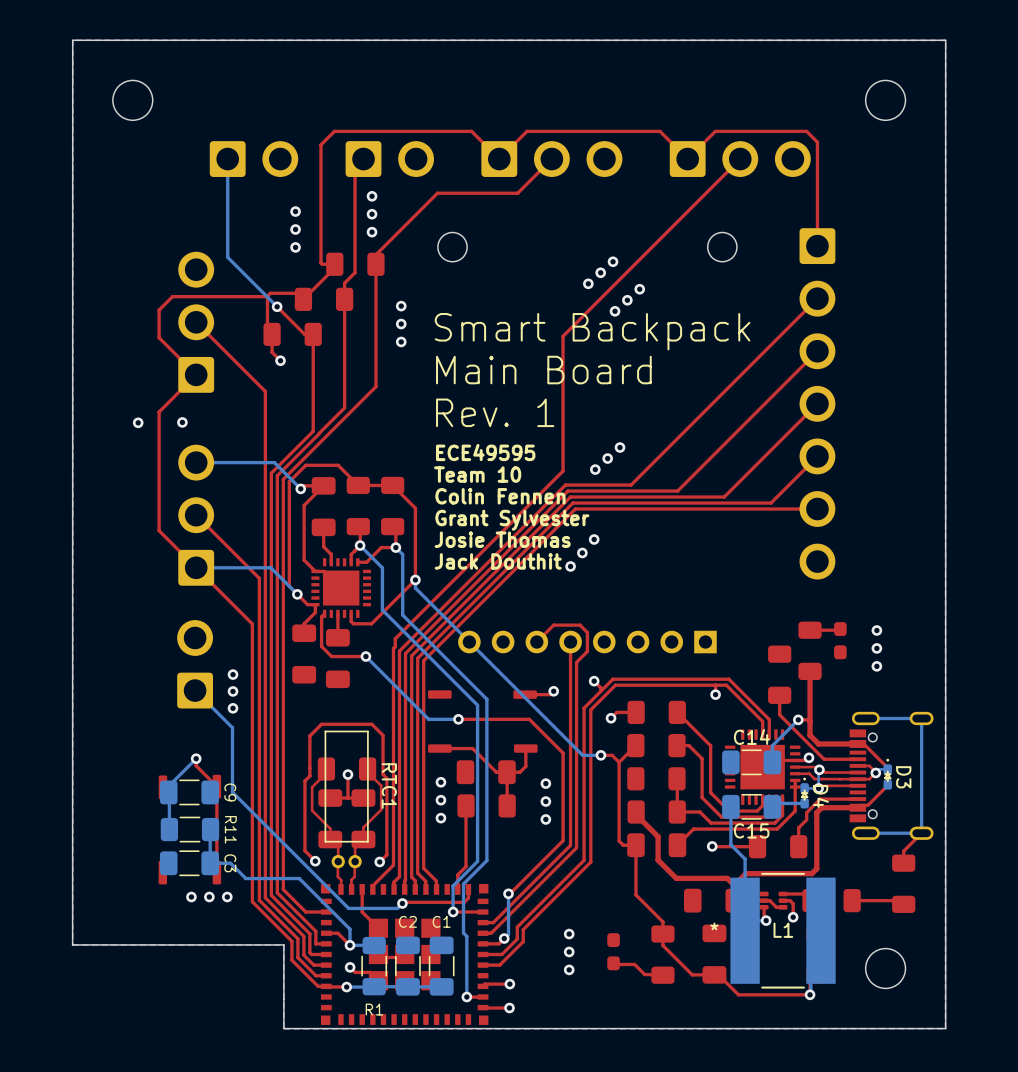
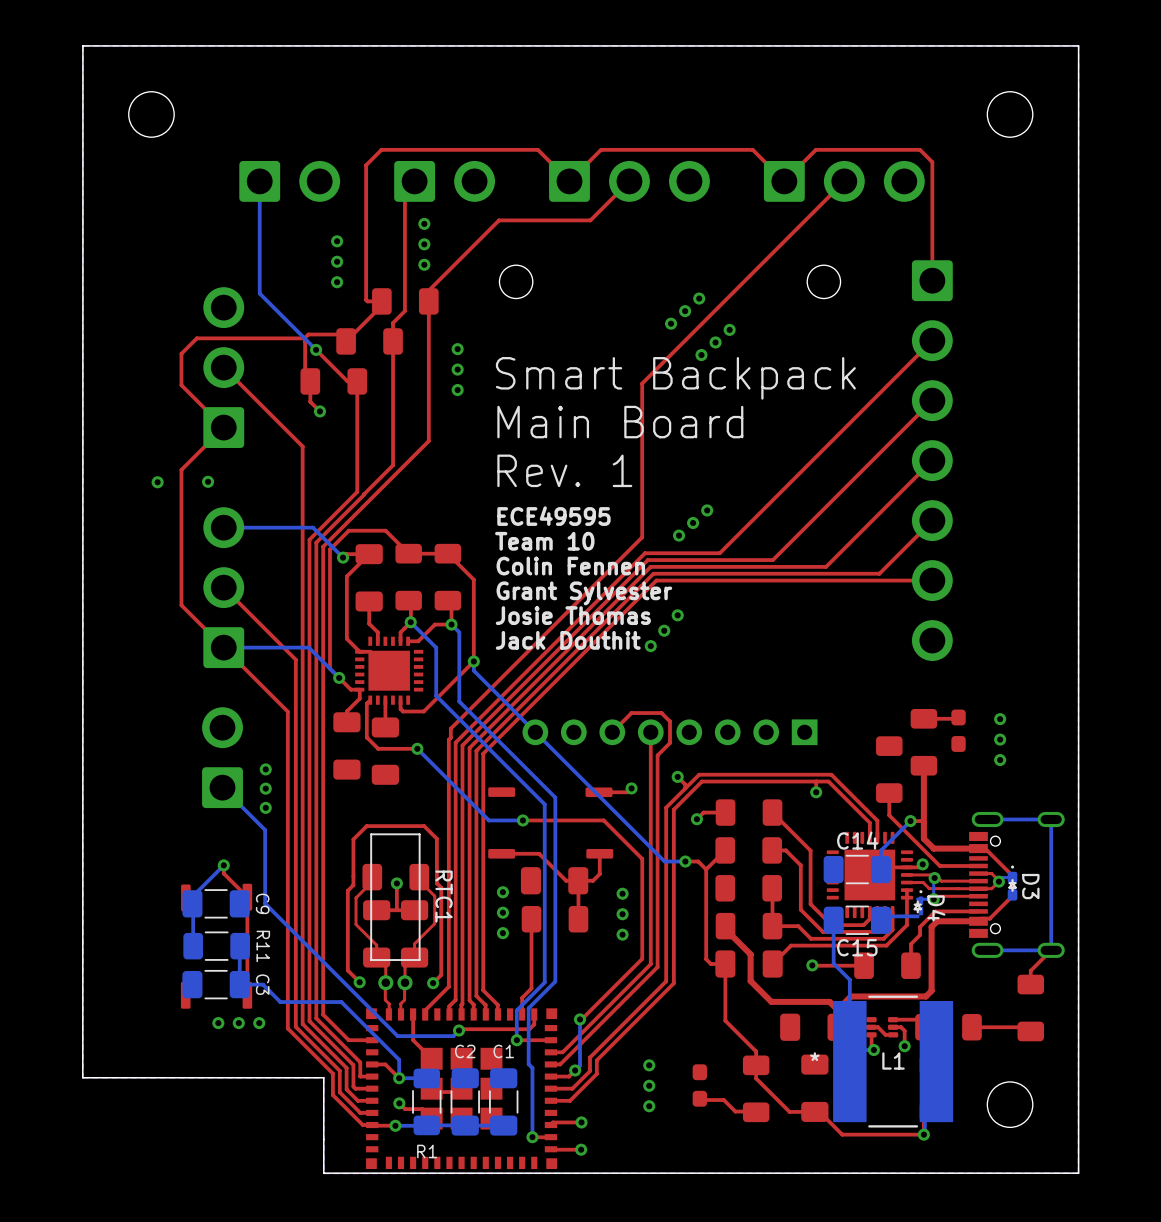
D4 footprint: [800, 777, 809, 809] -> [918, 890, 924, 916]

